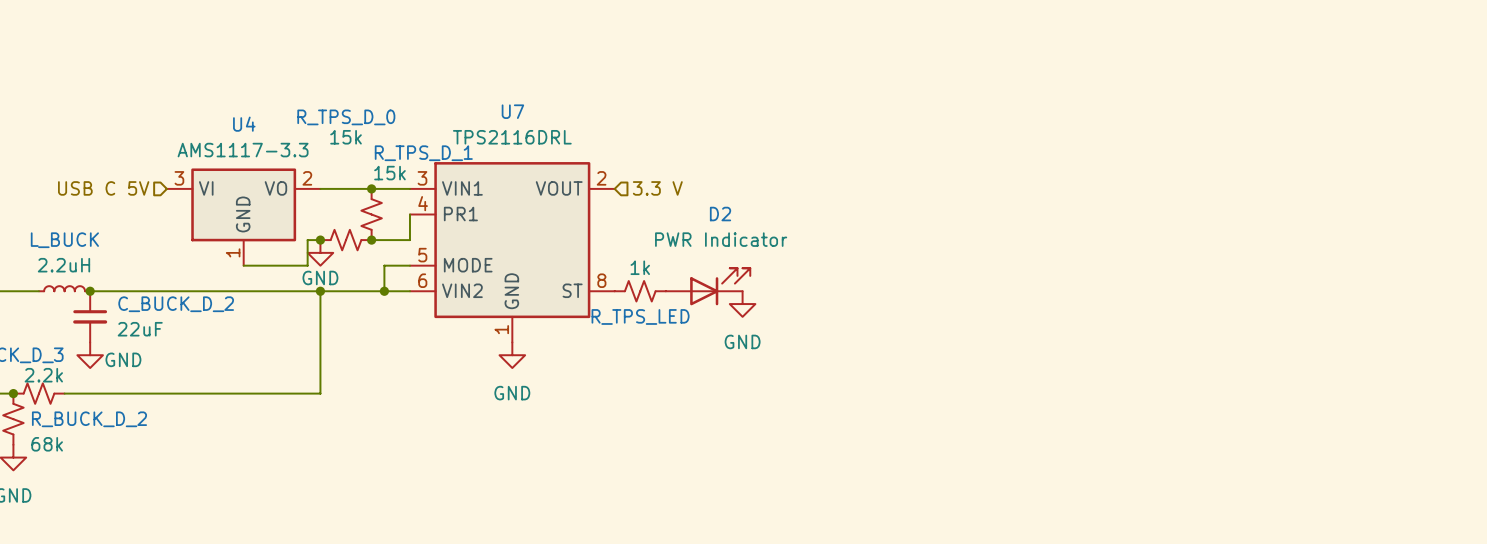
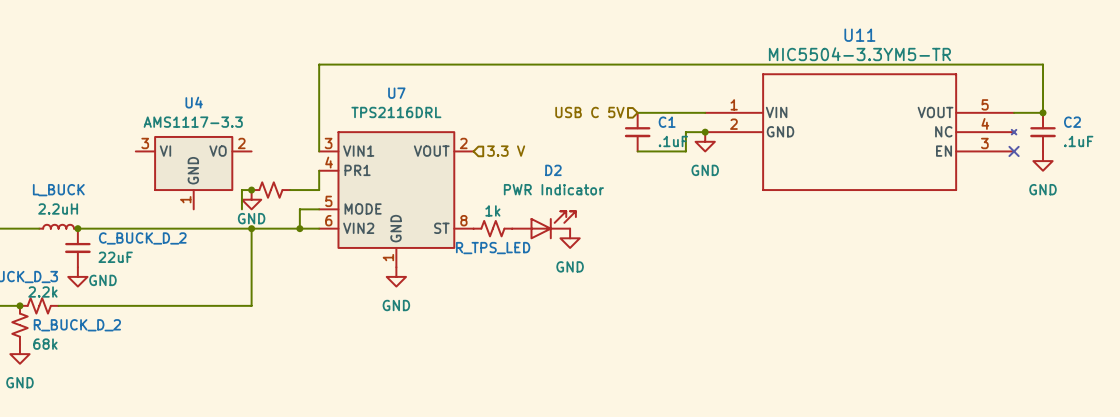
R_TPS_D_0 name: R_TPS_D_0 (346, 117) -> none
R_TPS_D_0 value: 15k (346, 137) -> none
hierarchical label: none -> USB C 5V (589, 112)
wire: none -> (637, 112) (705, 112)
junction: none -> (1043, 112)
C1: none -> .1uF (637, 132)
wire: none -> (705, 132) (685, 132) (685, 151) (637, 151)
junction: none -> (705, 132)
U11: none -> MIC5504-3.3YM5-TR (860, 132)
C2: none -> .1uF (1043, 132)
power symbol: none -> GND (705, 141)
hierarchical label: USB C 5V (103, 188) -> none
wire: (320, 188) (409, 188) -> (1014, 112) (1043, 112) (1043, 64) (319, 64) (319, 151)
junction: (371, 188) -> none
no-connect mark: none -> (1014, 151)
power symbol: none -> GND (1043, 161)
R_TPS_D_1: 15k (371, 214) -> none
junction: (371, 240) -> none
wire: (243, 265) (307, 265) -> none

